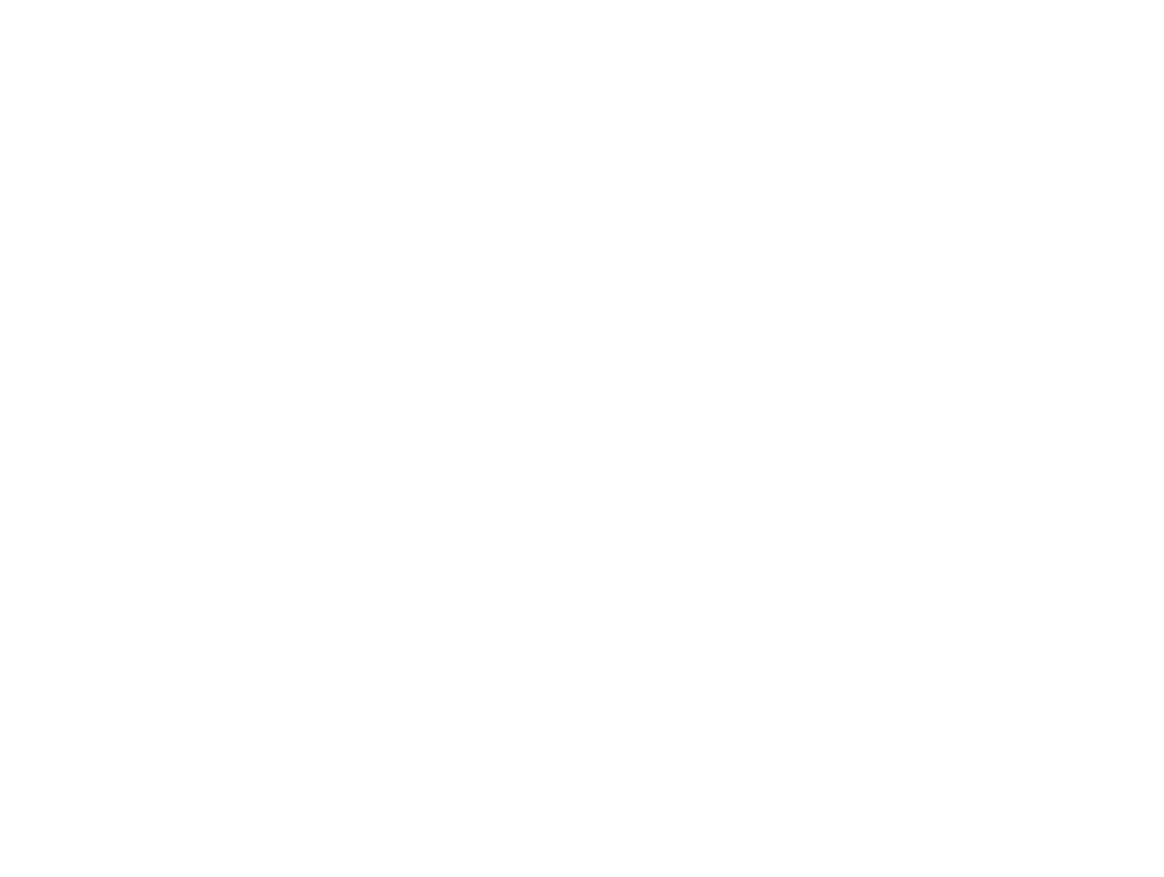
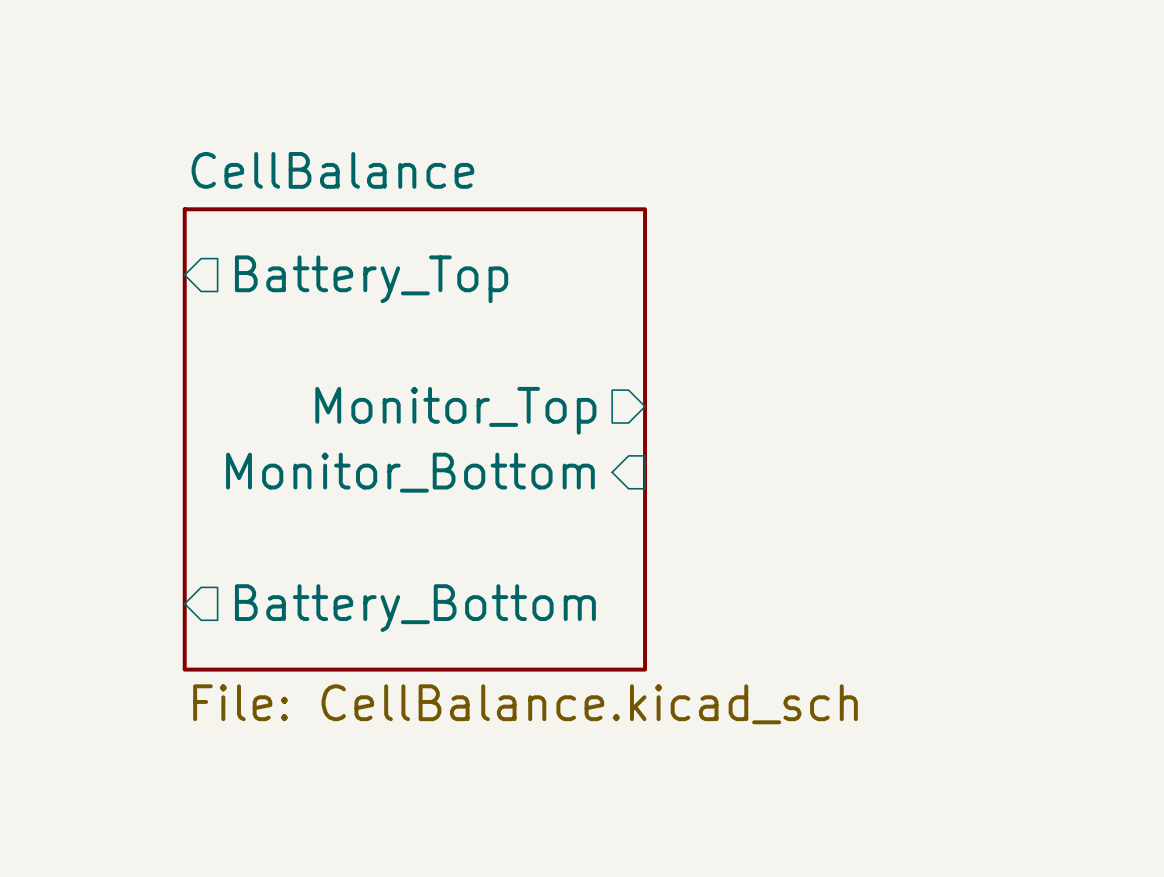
sheet pin: none -> Battery_Top (371, 279)
sheet pin: none -> Monitor_Top (455, 410)
sheet CellBalance: none -> File: CellBalance.kicad_sch (414, 439)
sheet pin: none -> Monitor_Bottom (410, 472)
sheet pin: none -> Battery_Bottom (415, 608)

